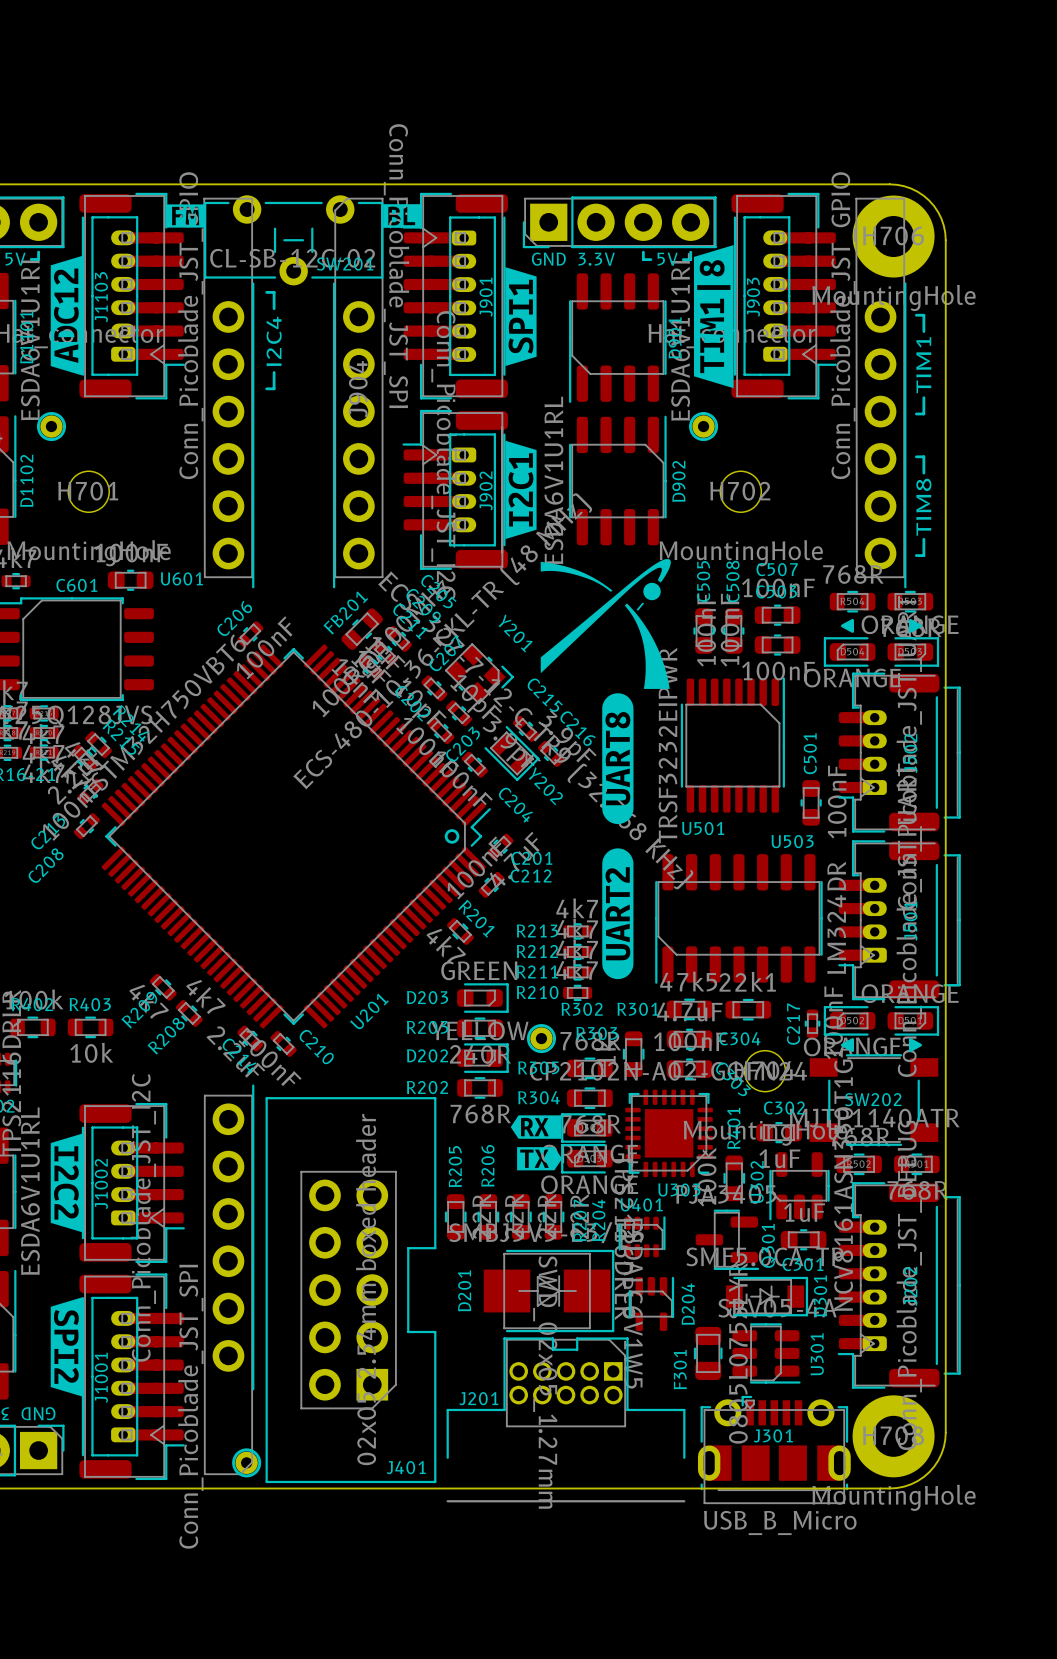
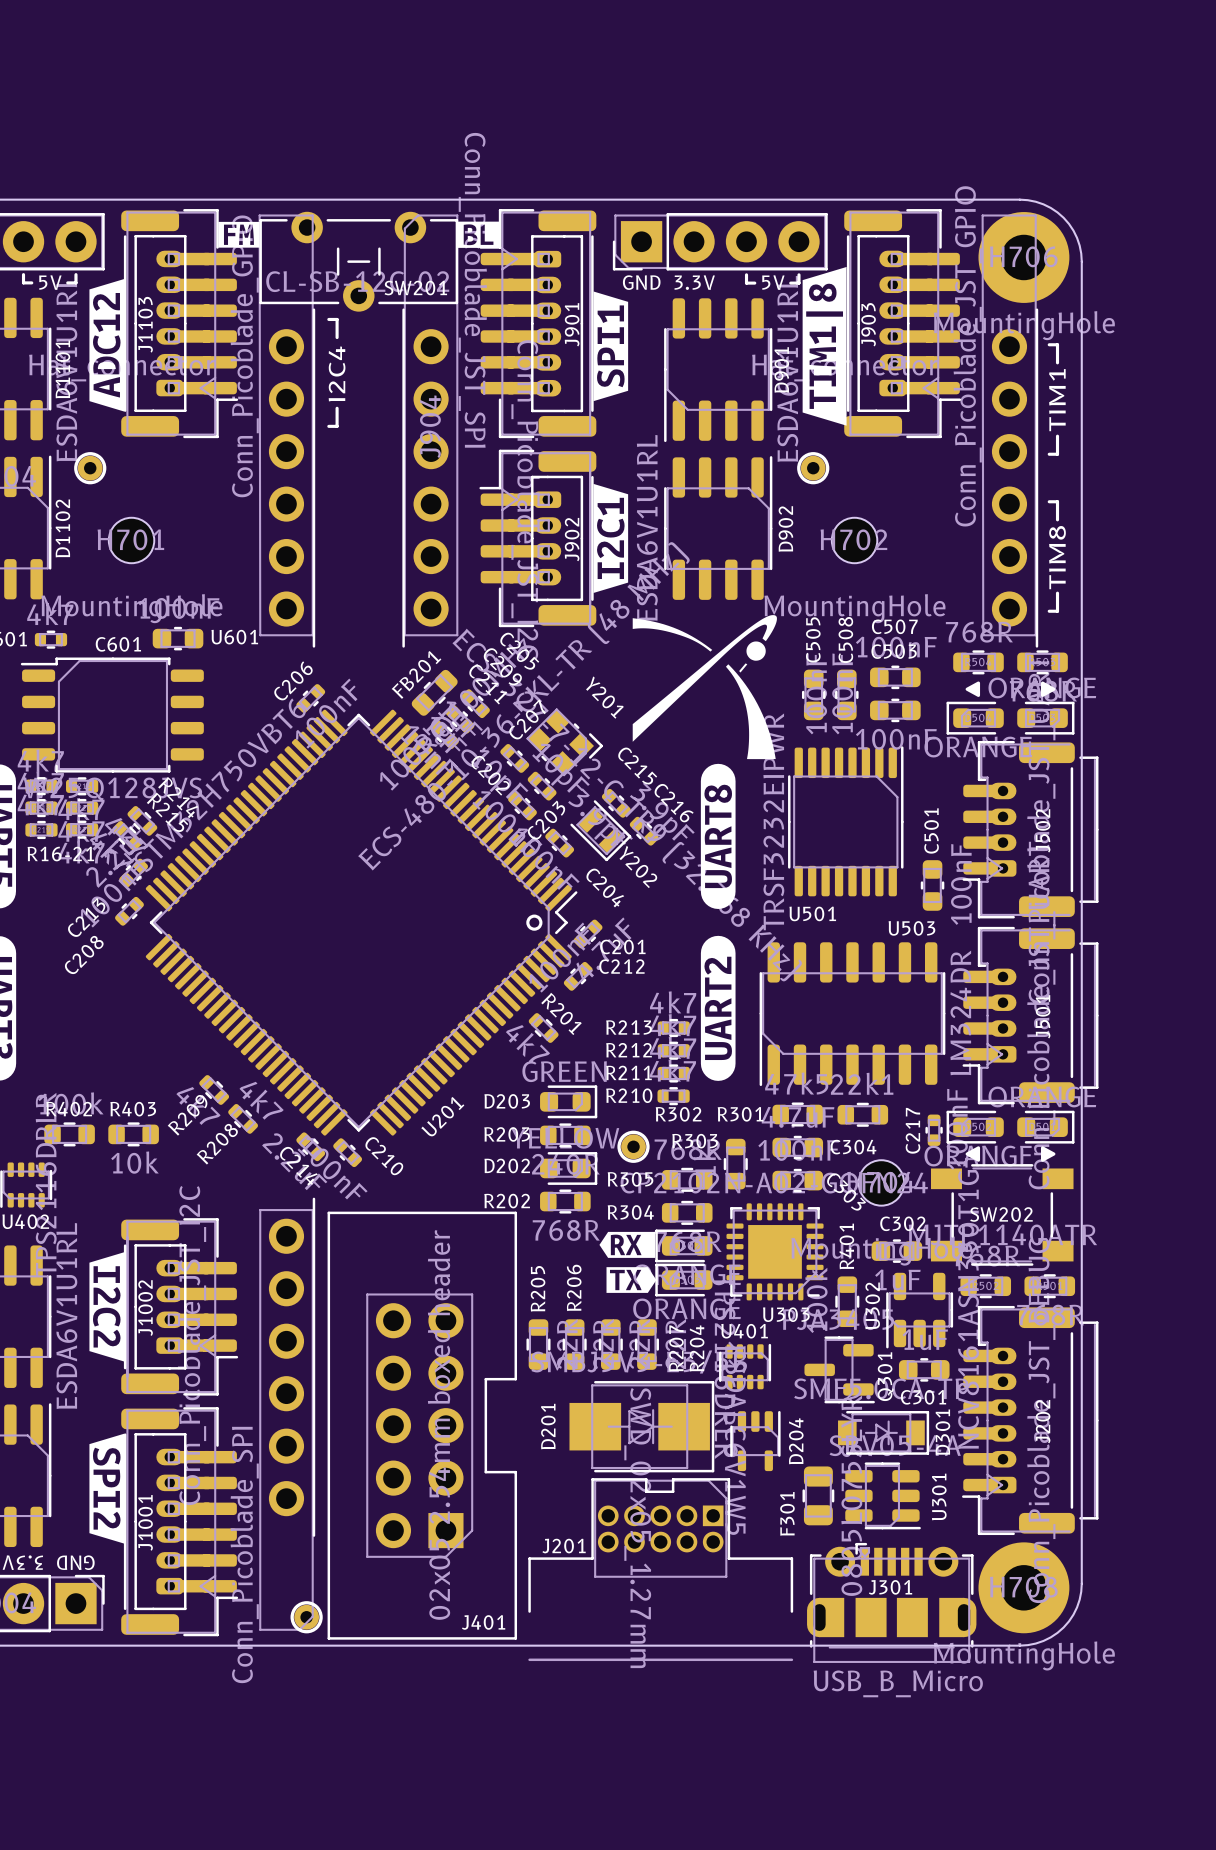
J1103 value: Conn_Picoblade_JST_GPIO (190, 325) -> Conn_Picoblade_GPIO (244, 356)
J1001 value: Conn_Picoblade_JST_SPI (190, 1406) -> Conn_Picoblade_SPI (244, 1555)

